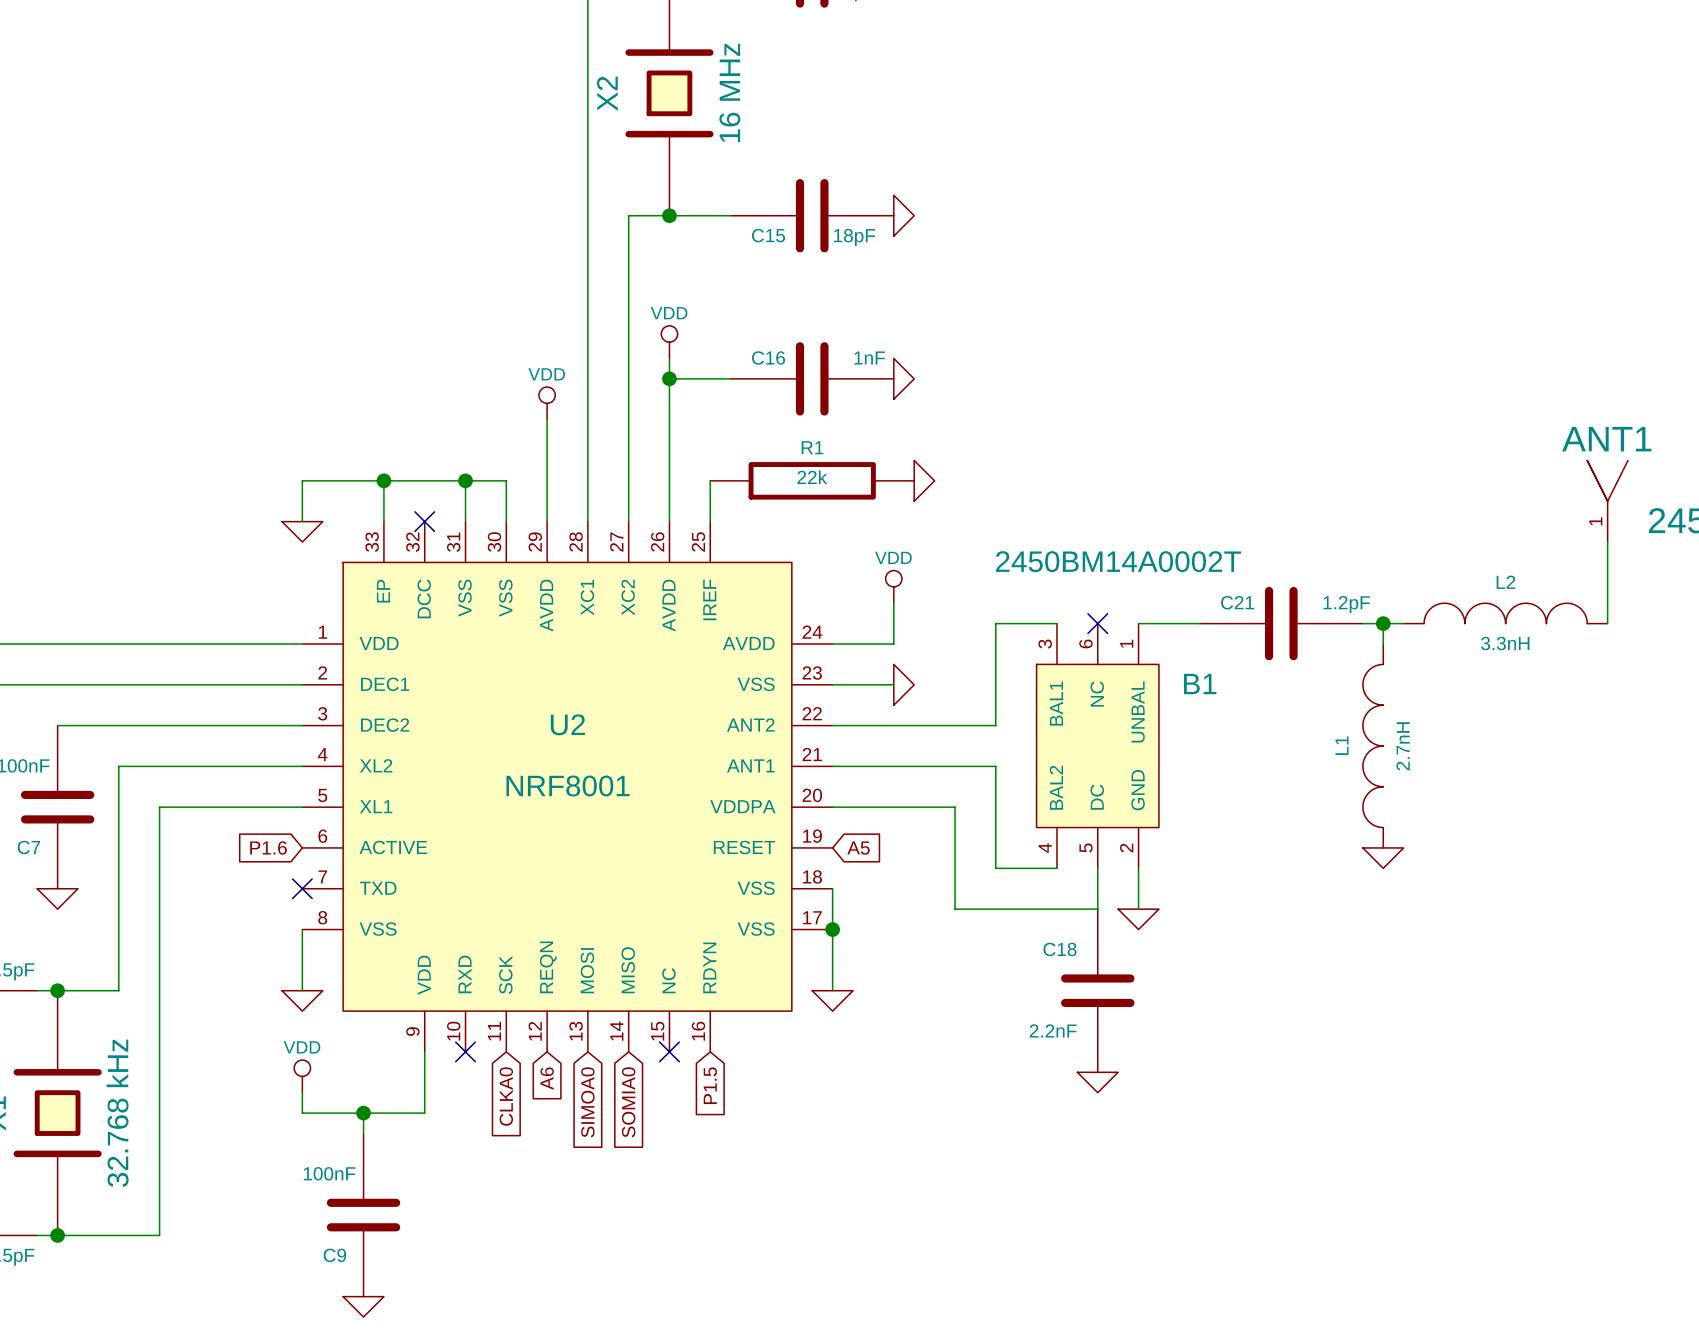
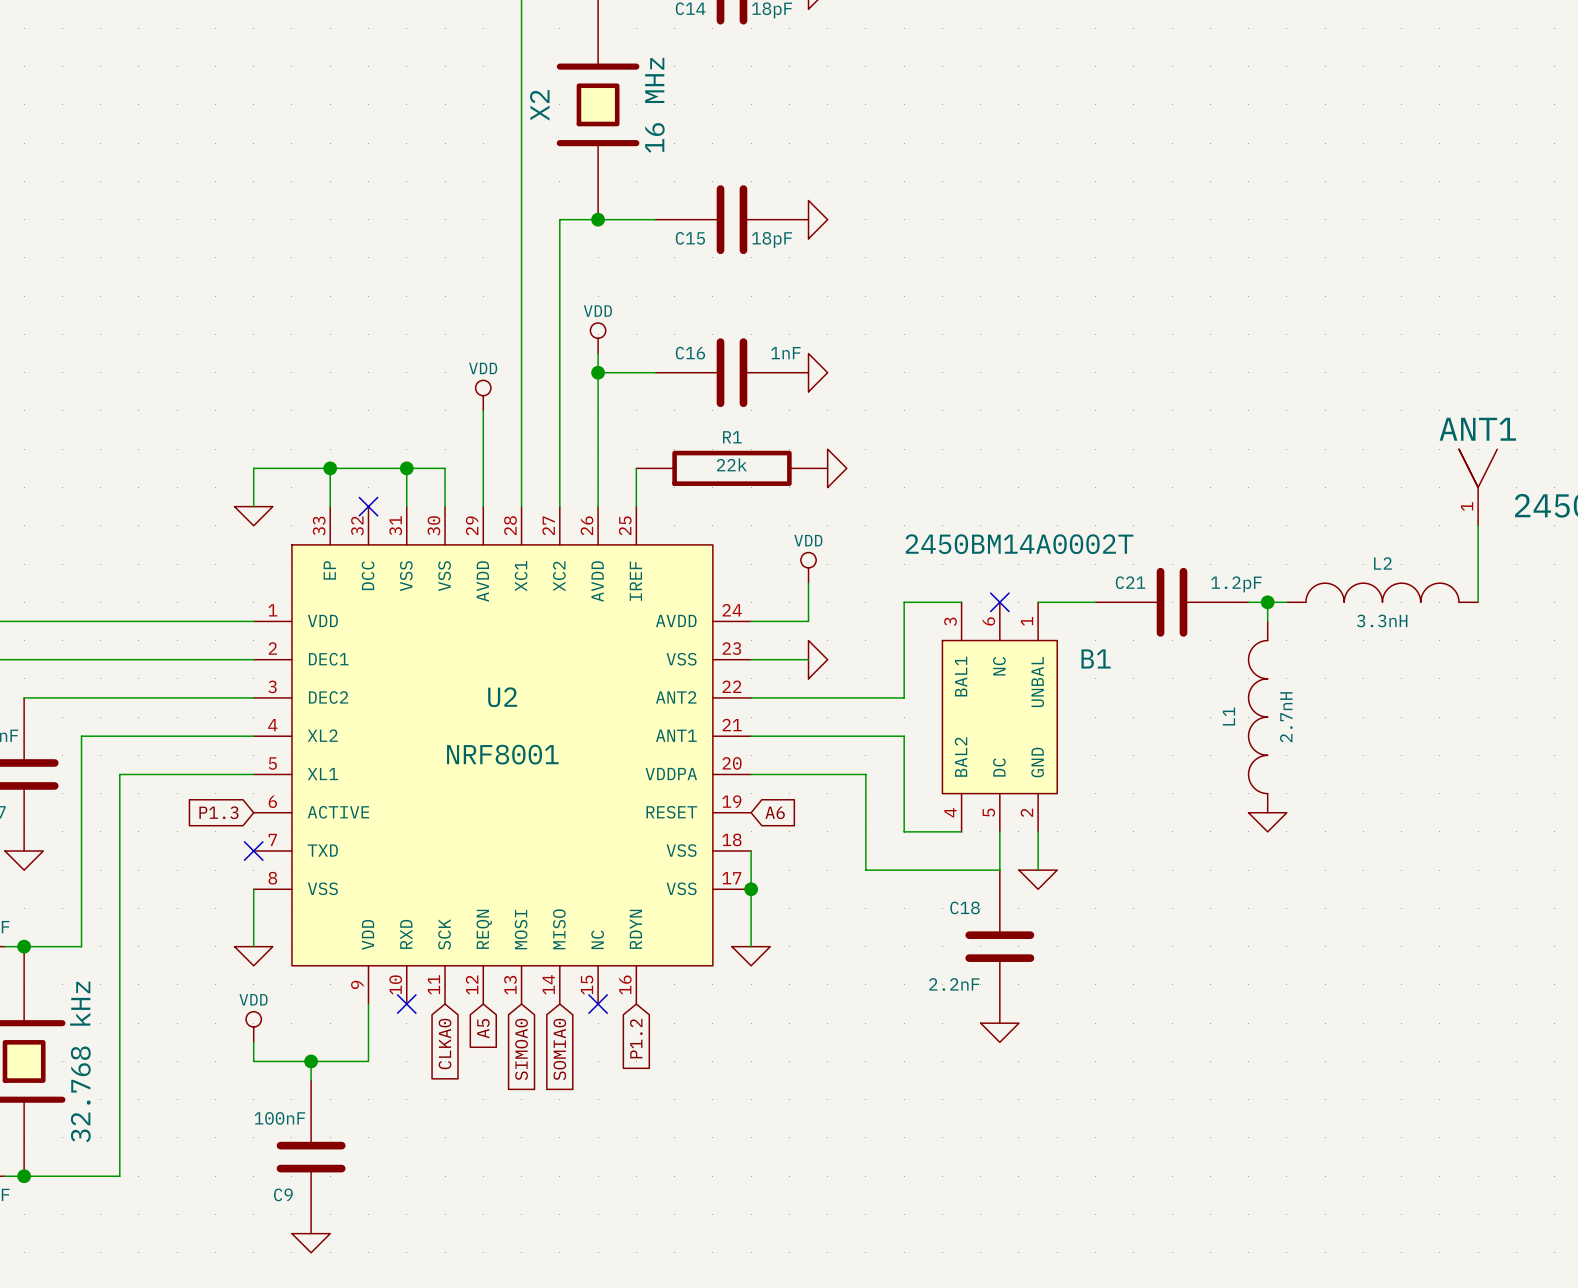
global label: P1.6 (268, 847) -> P1.3 (218, 812)
global label: A5 (858, 848) -> A6 (775, 812)
global label: A6 (547, 1078) -> A5 (483, 1028)
global label: P1.5 (710, 1085) -> P1.2 (636, 1038)

